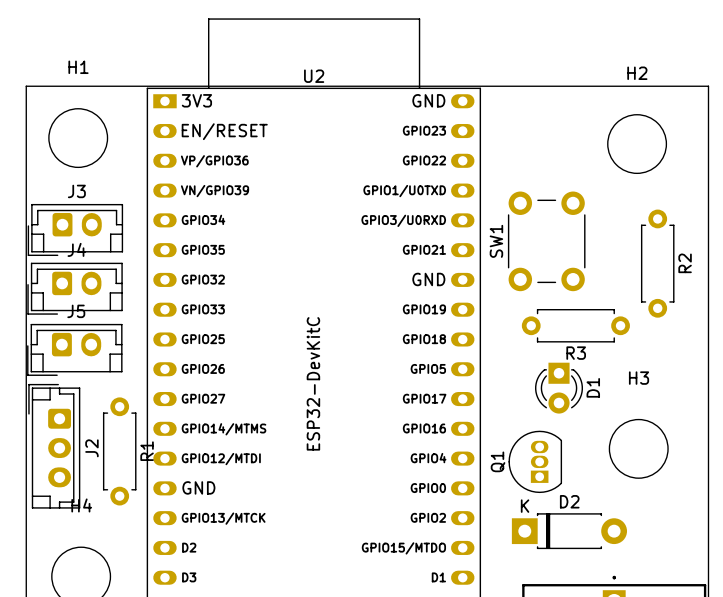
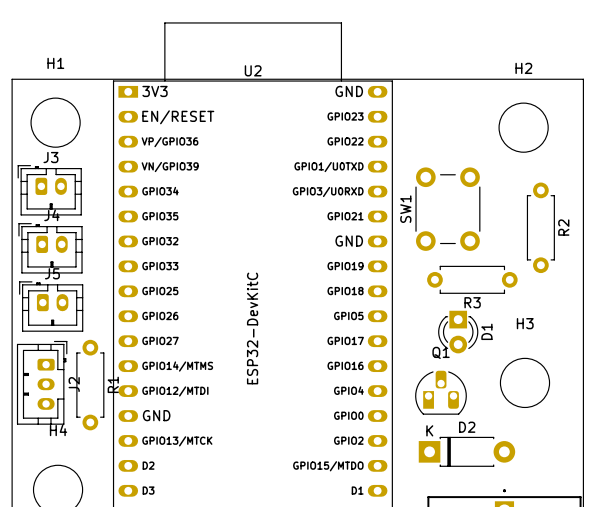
J3 footprint: [27, 203, 124, 257] -> [17, 165, 82, 216]
J4 footprint: [27, 262, 123, 315] -> [18, 223, 83, 274]
J5 footprint: [27, 323, 123, 376] -> [19, 281, 84, 332]
J2 footprint: [28, 383, 81, 509] -> [16, 340, 68, 425]
Q1 footprint: [508, 430, 563, 494] -> [415, 370, 467, 415]
Q1 name position: Q1 (498, 461) -> Q1 (441, 352)

